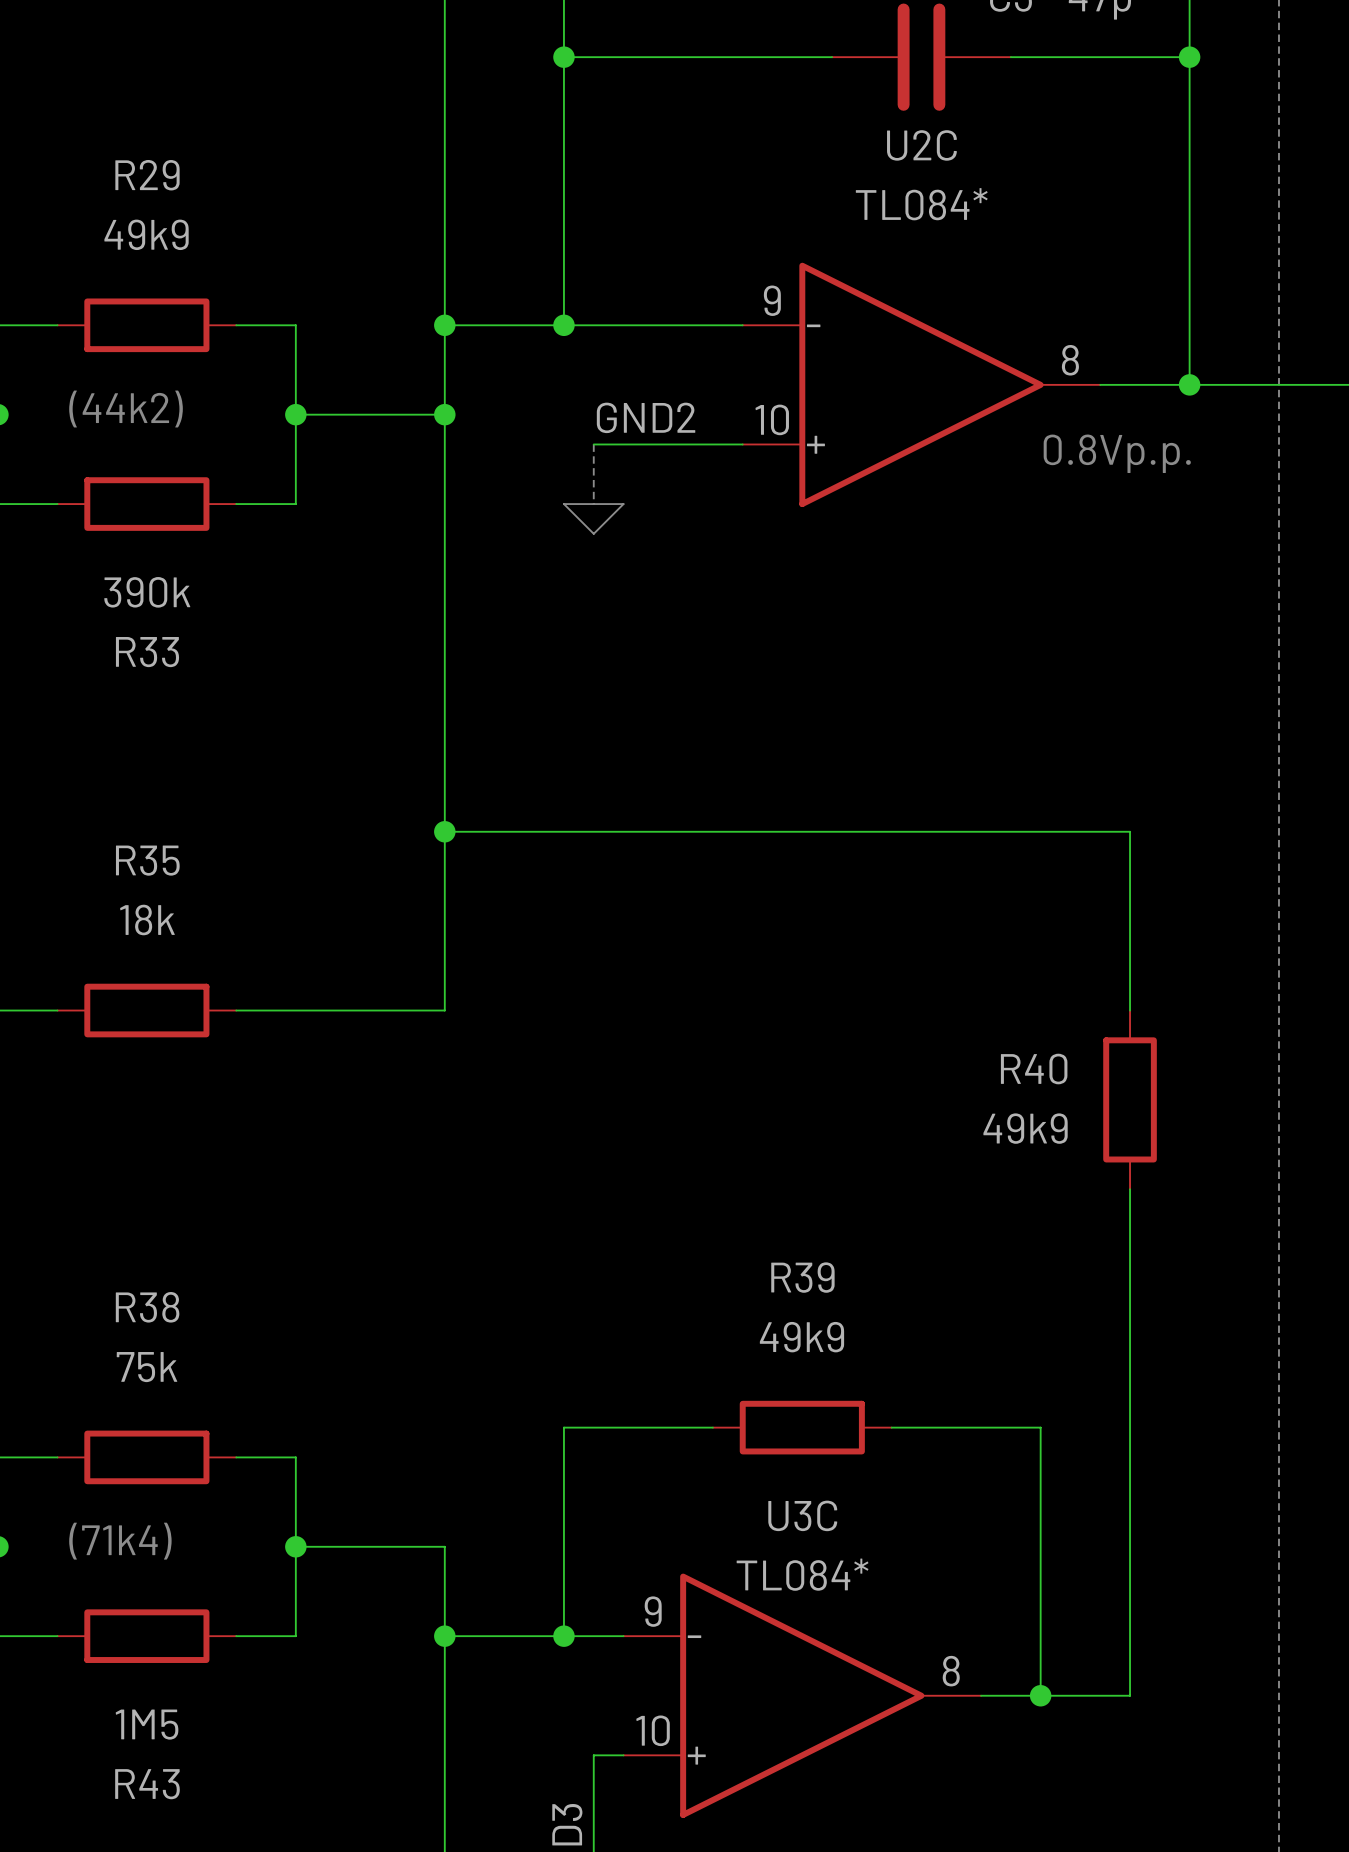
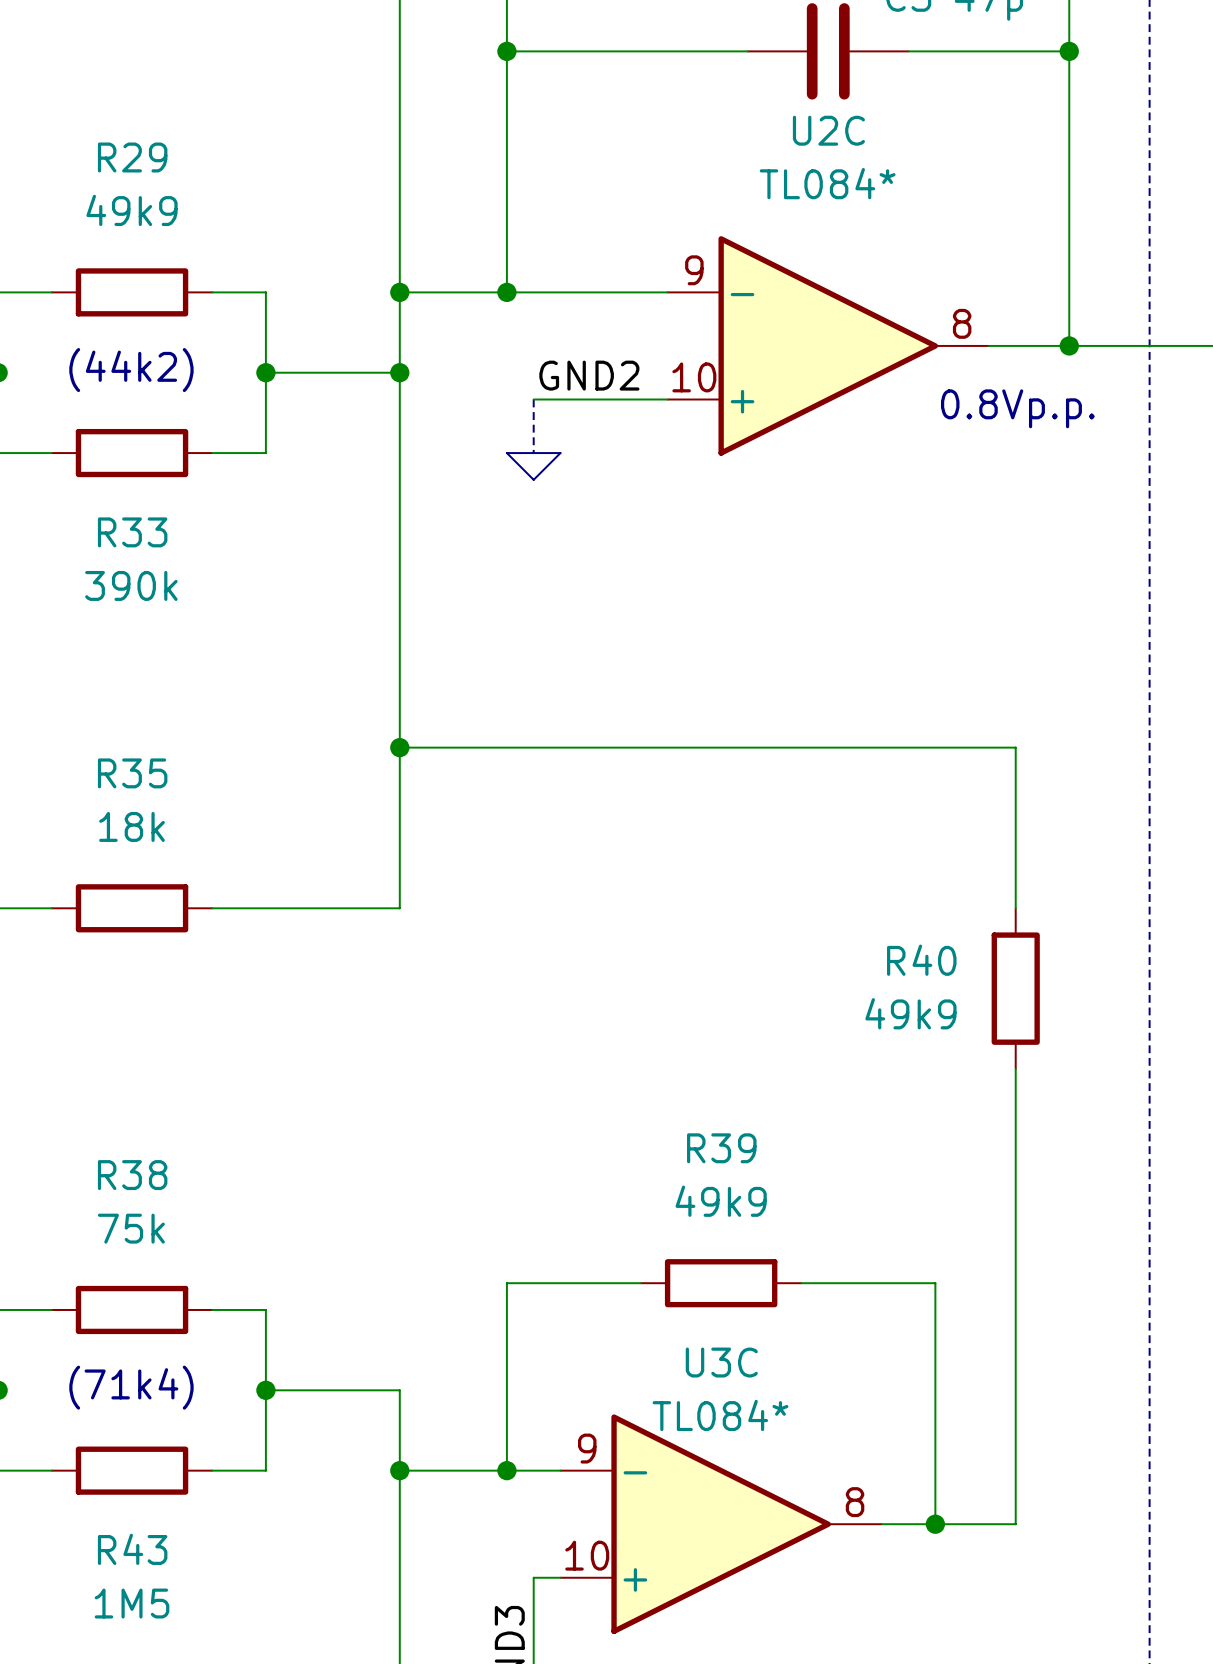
R33 value position: 390k (147, 592) -> 390k (131, 585)
R33 name position: R33 (147, 652) -> R33 (132, 532)
R43 value position: 1M5 (147, 1724) -> 1M5 (132, 1603)
R43 name position: R43 (147, 1784) -> R43 (132, 1549)

